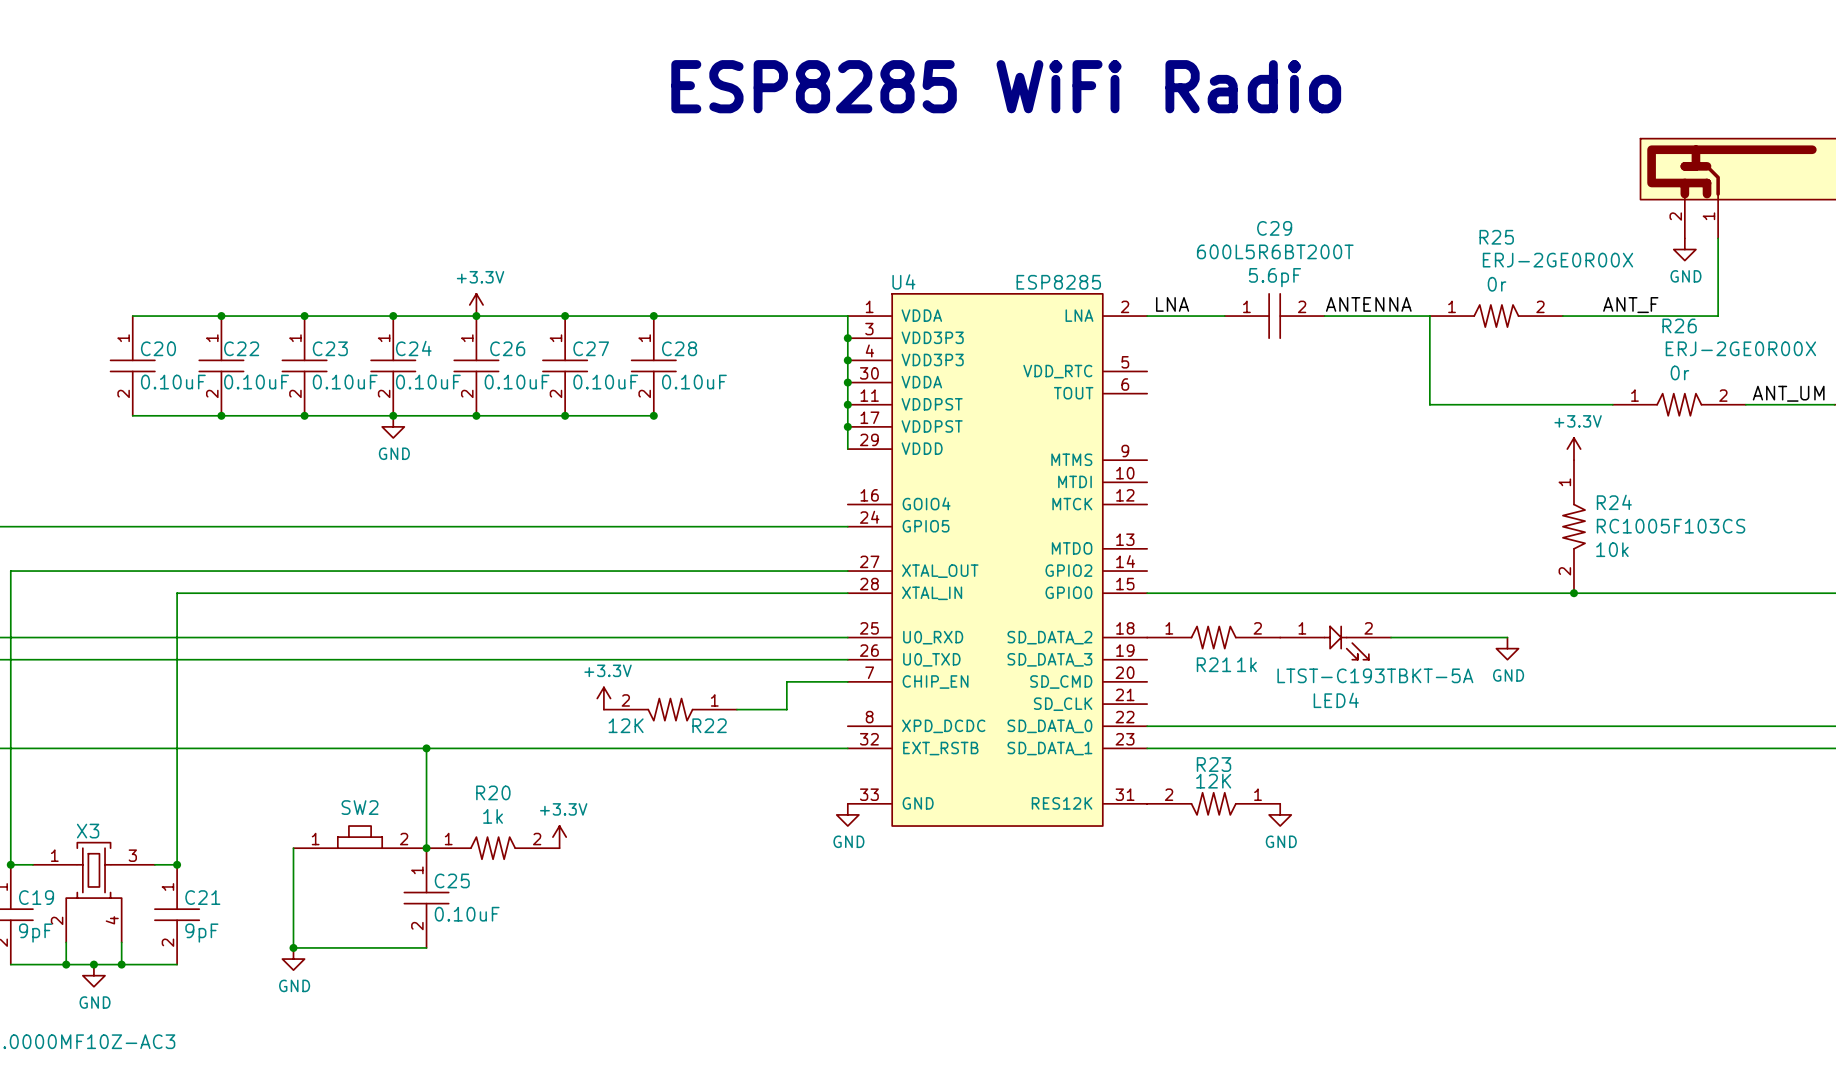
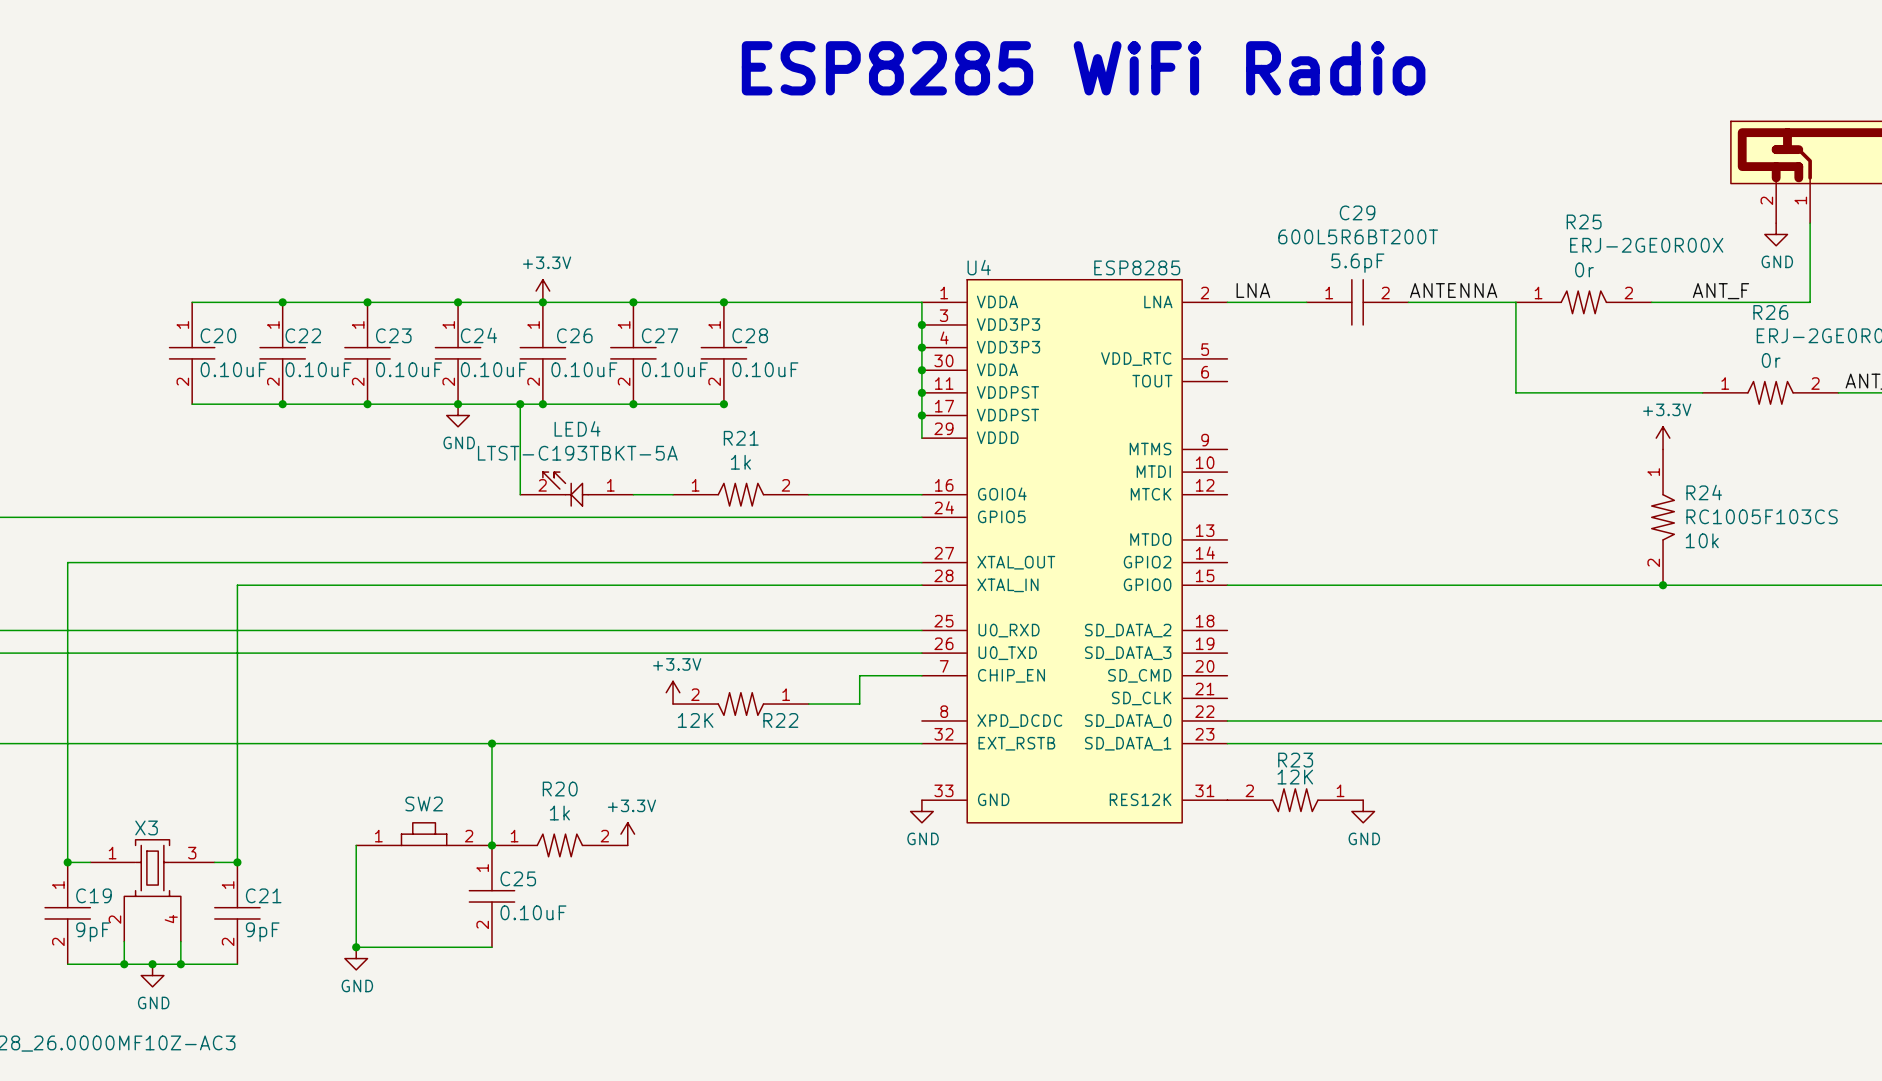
wire: none -> (520, 404) (520, 494)
junction: none -> (520, 404)
wire: none -> (633, 494) (673, 494)
wire: none -> (808, 494) (921, 494)
R21 position: (1213, 637) -> (740, 494)
wire: (1391, 637) (1507, 637) -> none
LED4 position: (1335, 643) -> (576, 489)
LED4 rotation: 0° (1346, 643) -> 180° (565, 489)
power symbol: GND (1507, 648) -> none
R21 name position: R21 (1213, 664) -> R21 (741, 438)
R21 text position: 1k (1246, 664) -> 1k (740, 462)
LED4 value position: LTST-C193TBKT-5A (1375, 675) -> LTST-C193TBKT-5A (577, 453)

